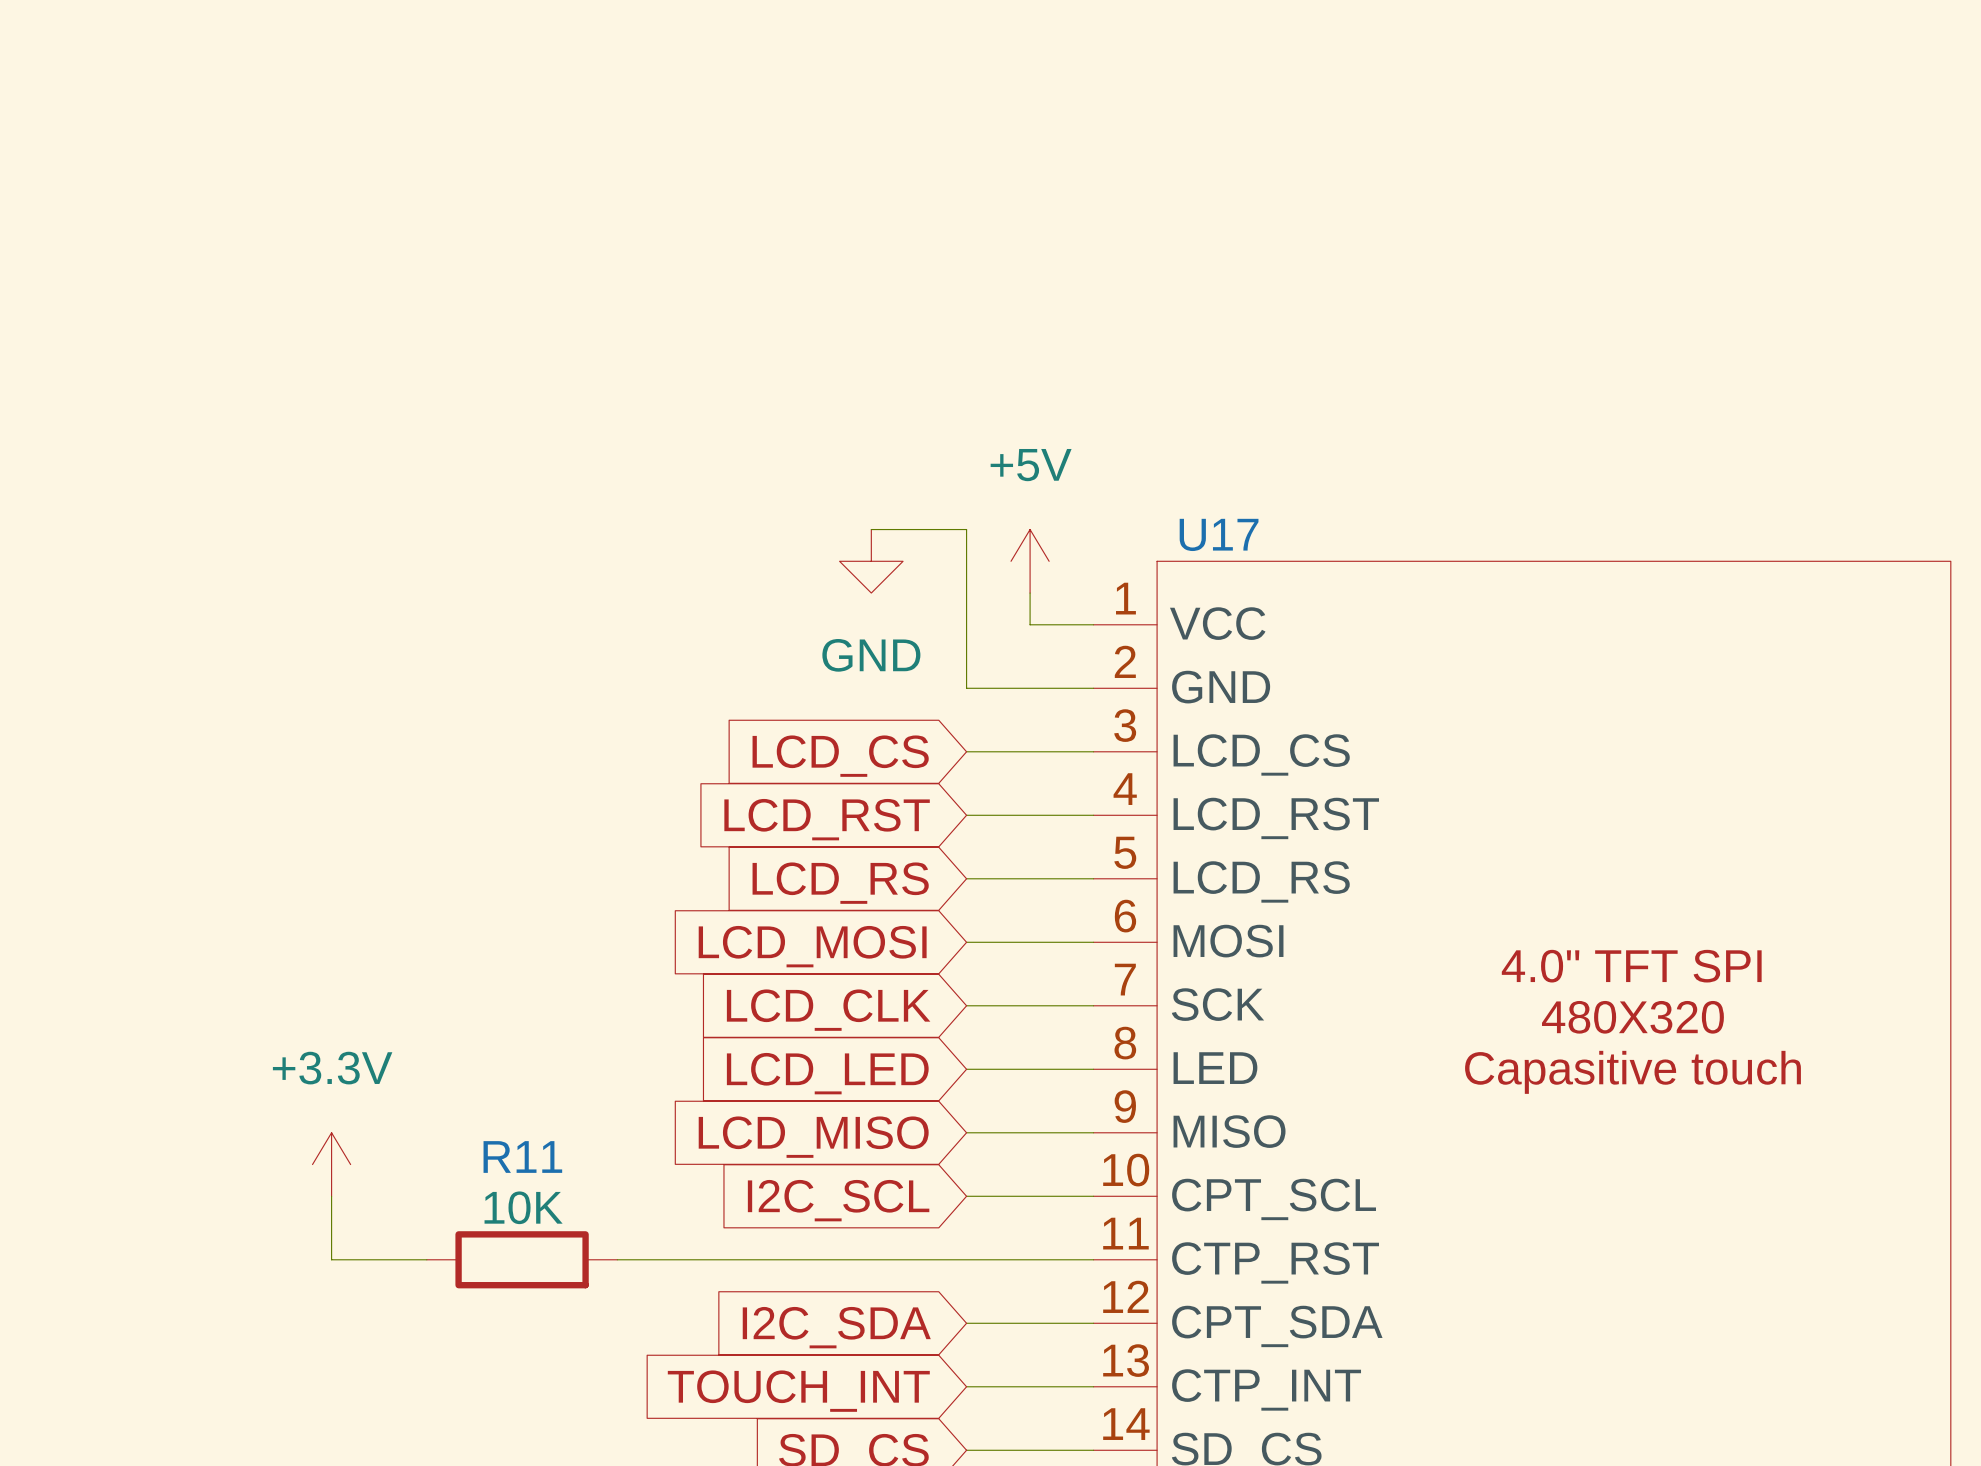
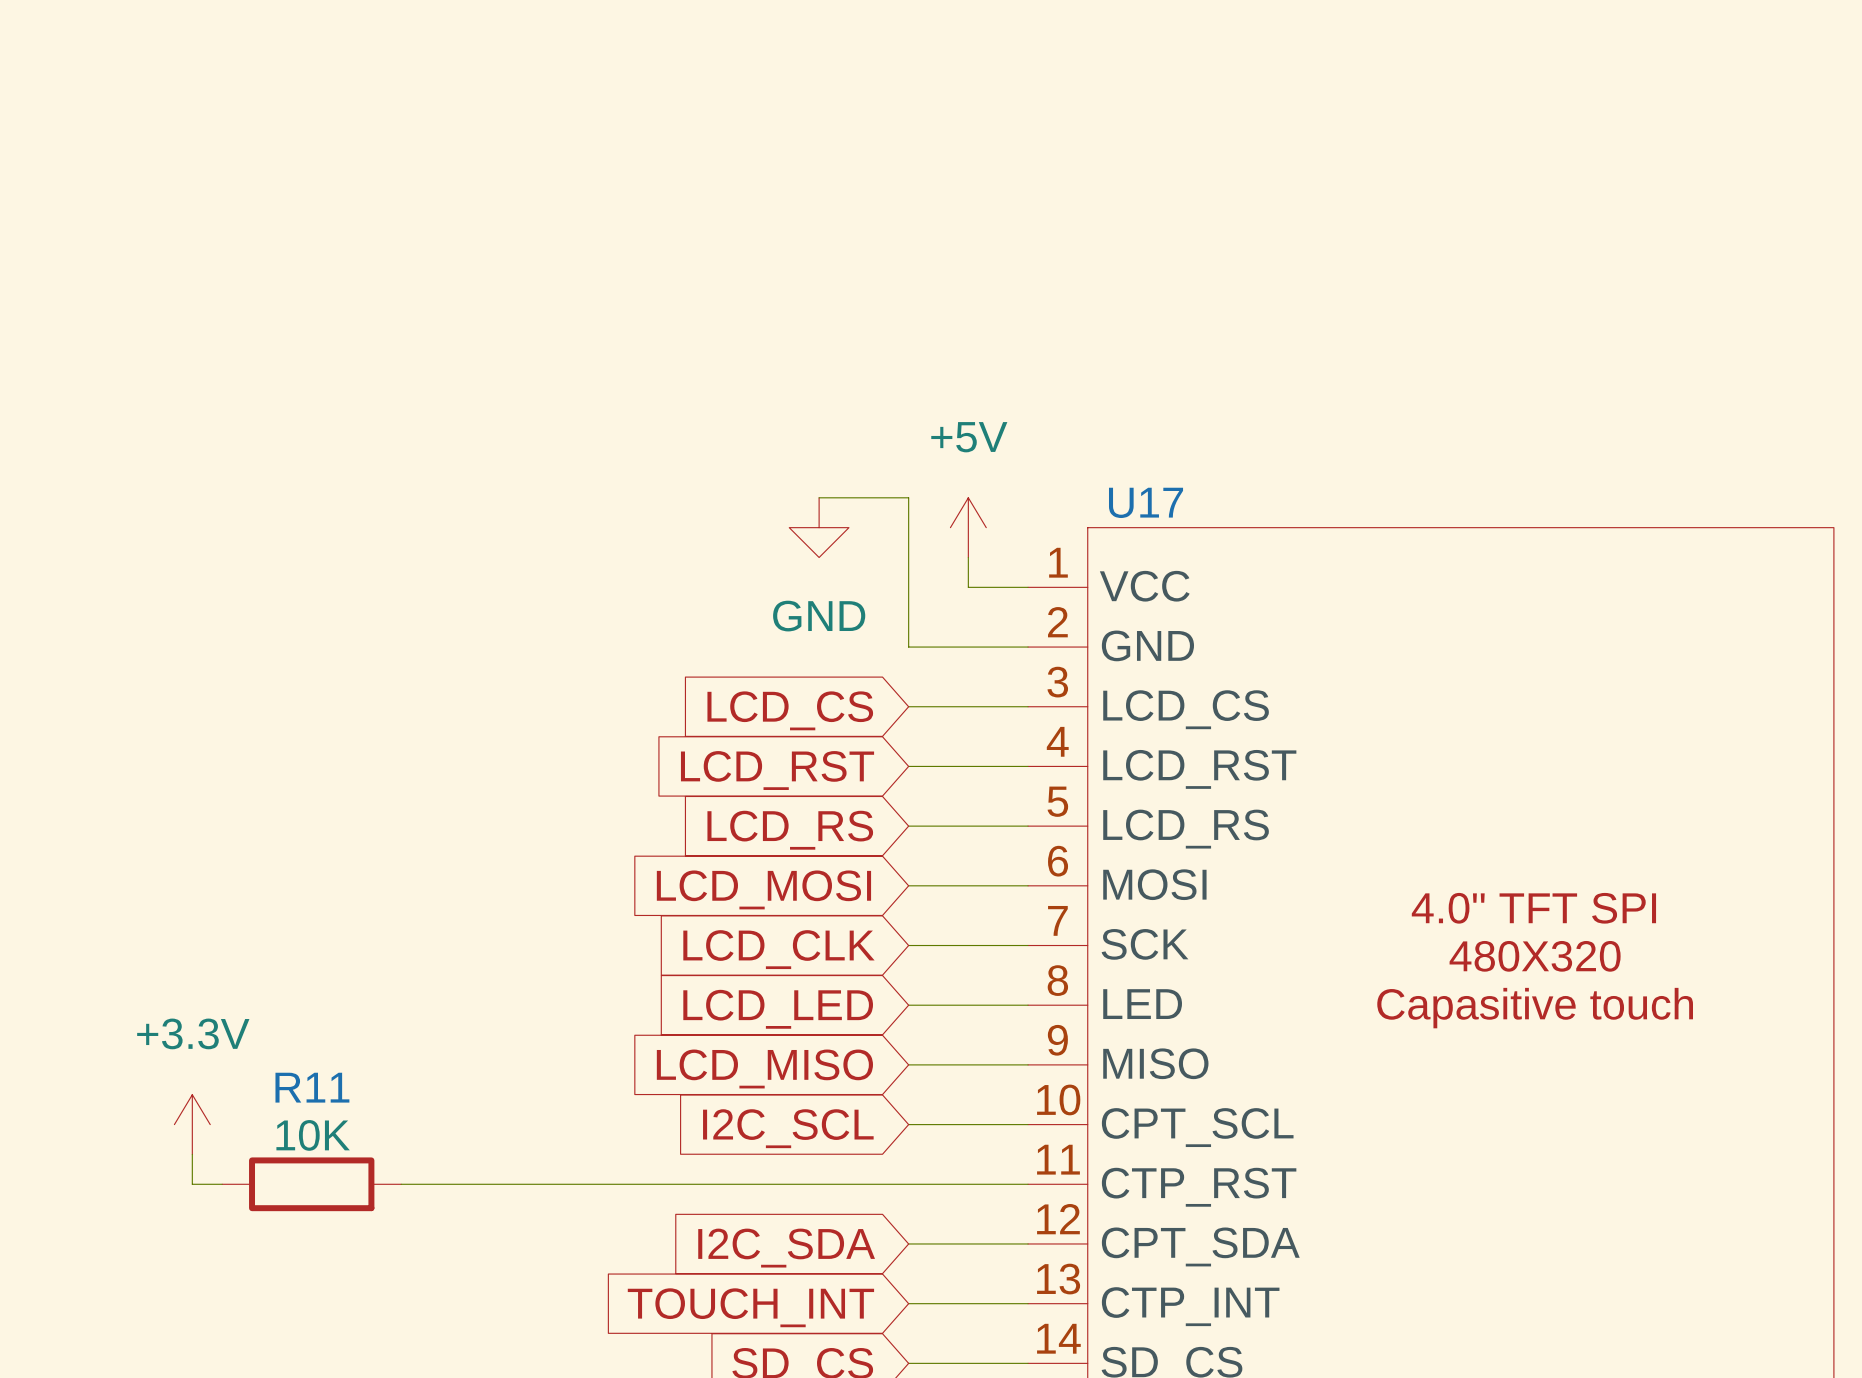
power symbol position: +3.3V (331, 1164) -> +3.3V (192, 1124)
wire: (331, 1196) (331, 1259) (426, 1259) -> (580, 1184) (401, 1184)
wire: none -> (192, 1154) (192, 1184) (222, 1184)
R11 position: (522, 1259) -> (311, 1184)

